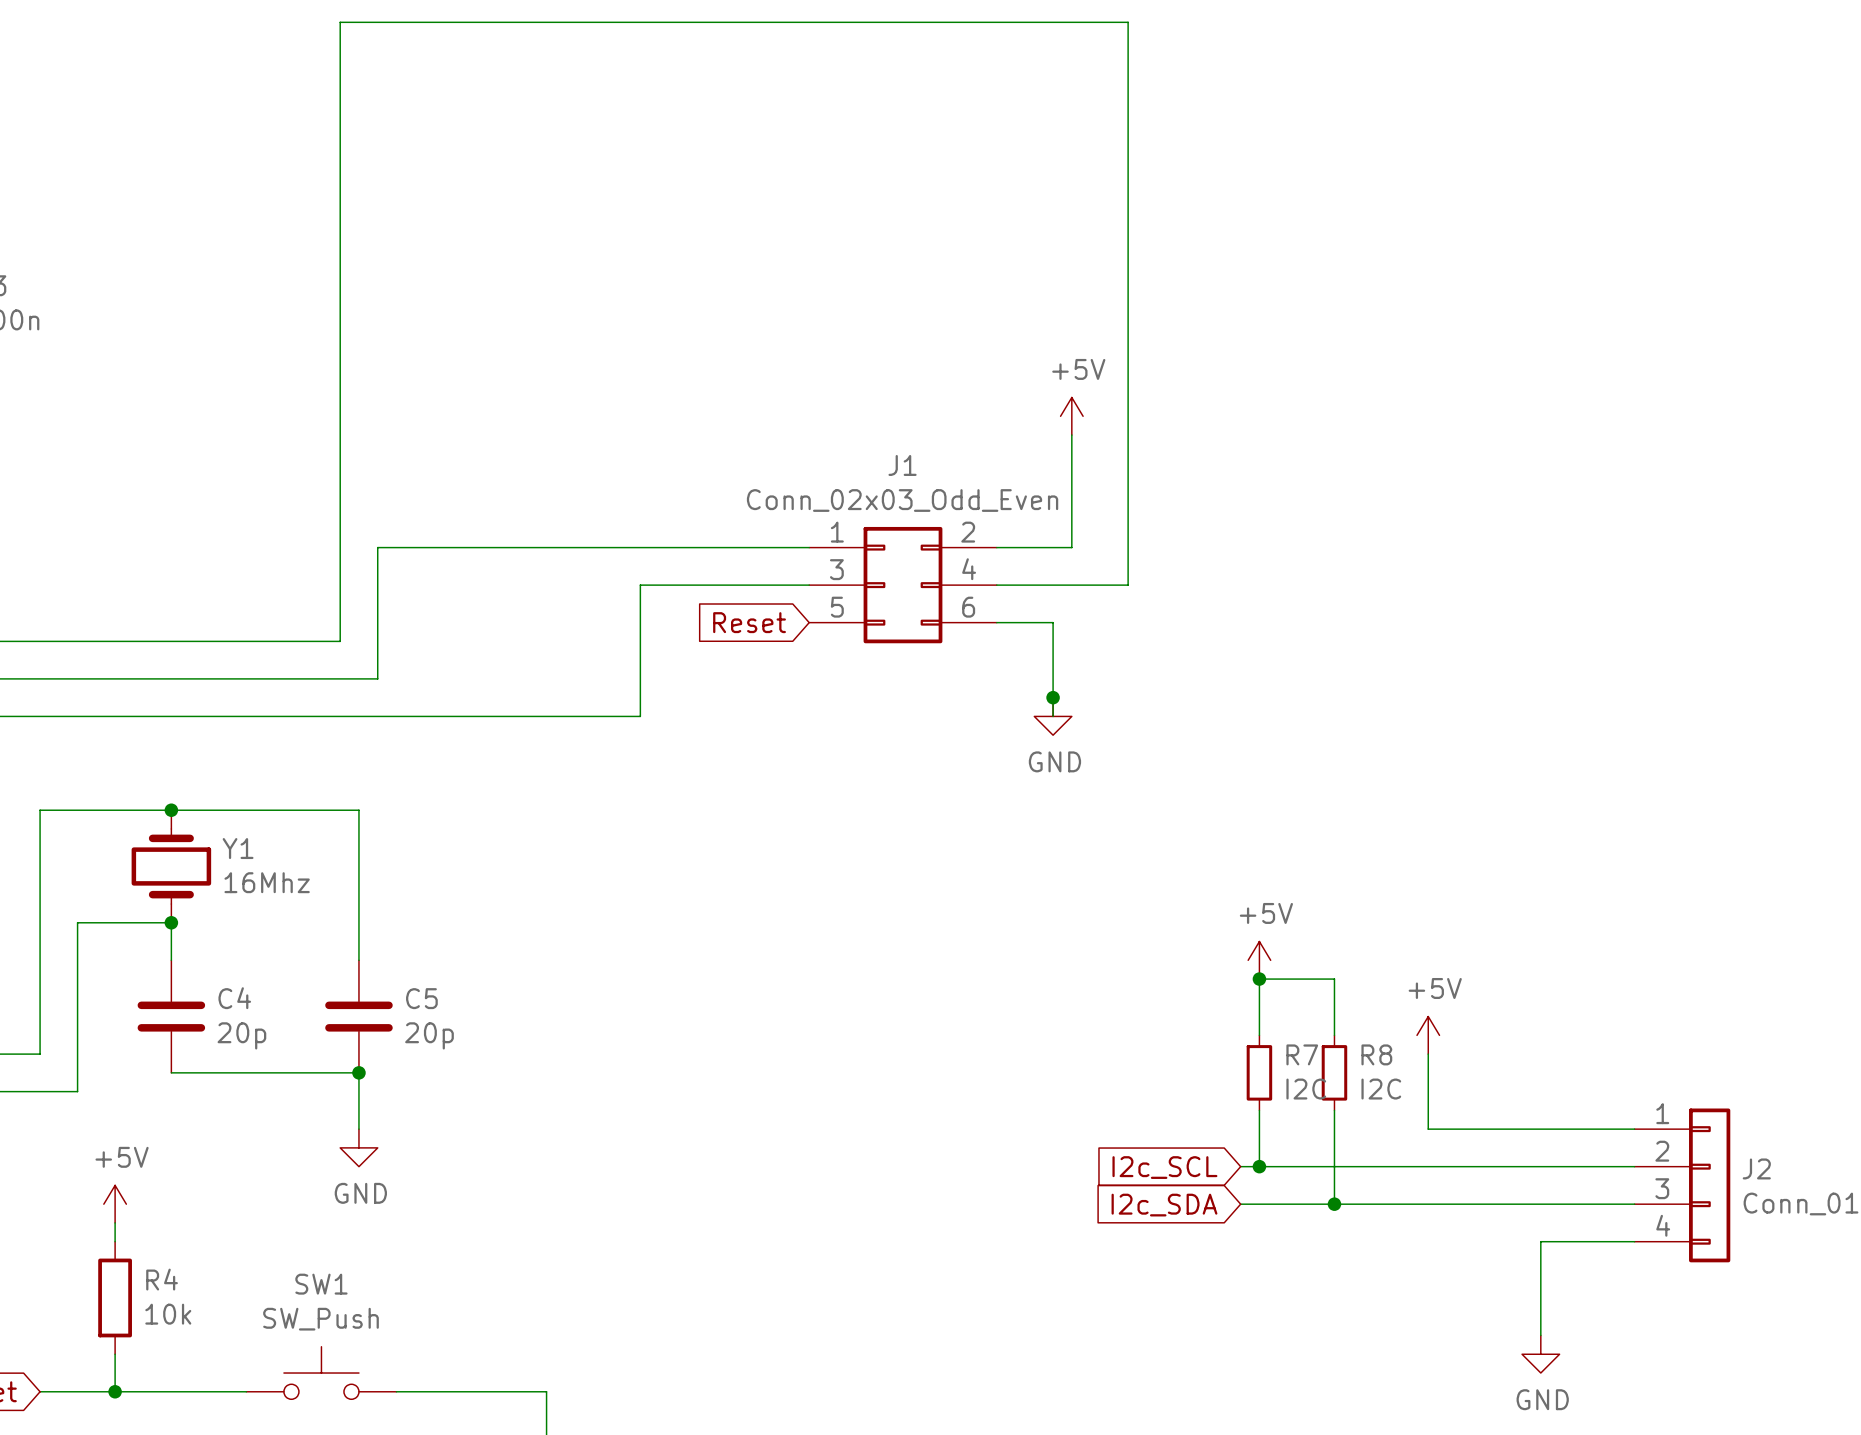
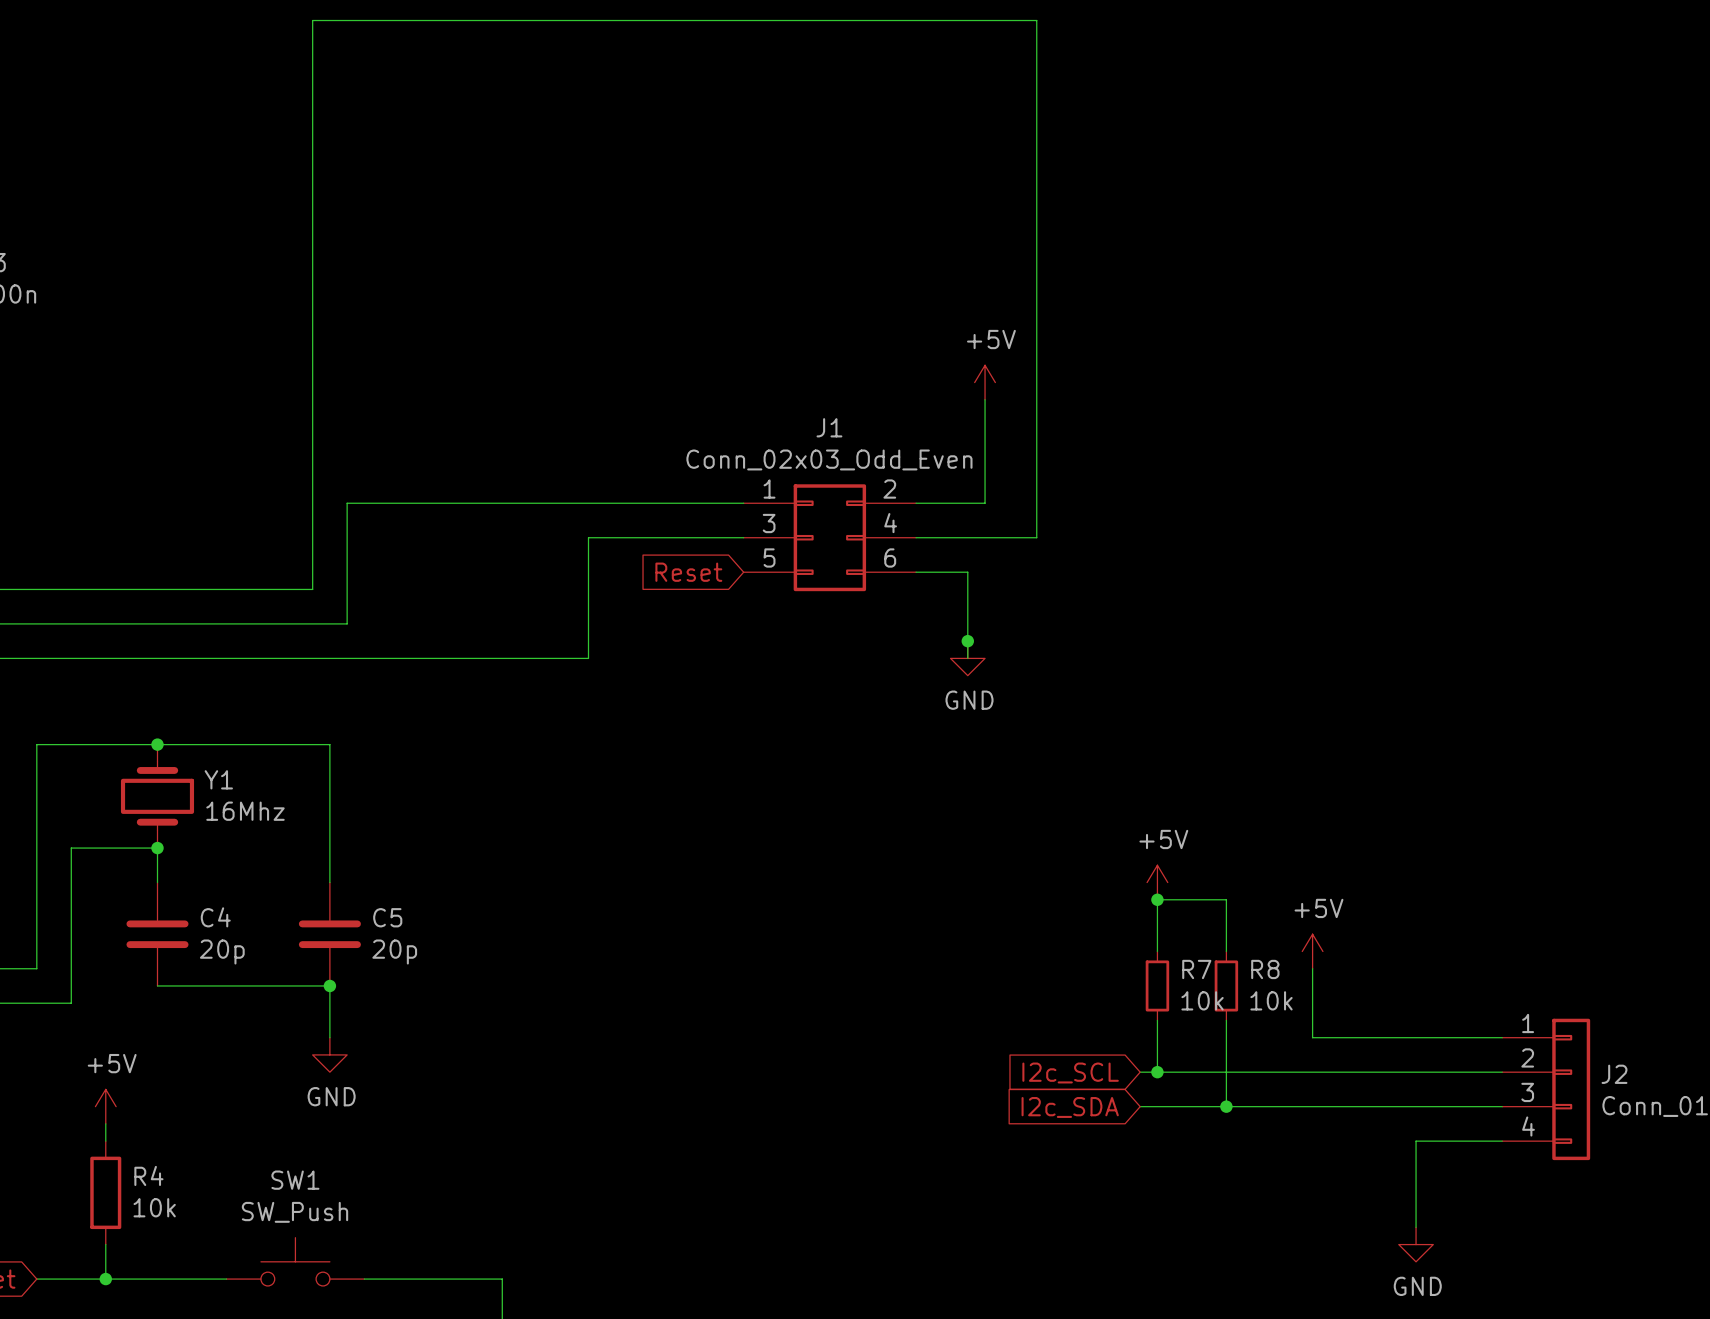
R7 value: I2C (1306, 1089) -> 10k (1202, 1000)
R8 value: I2C (1381, 1089) -> 10k (1271, 1000)

